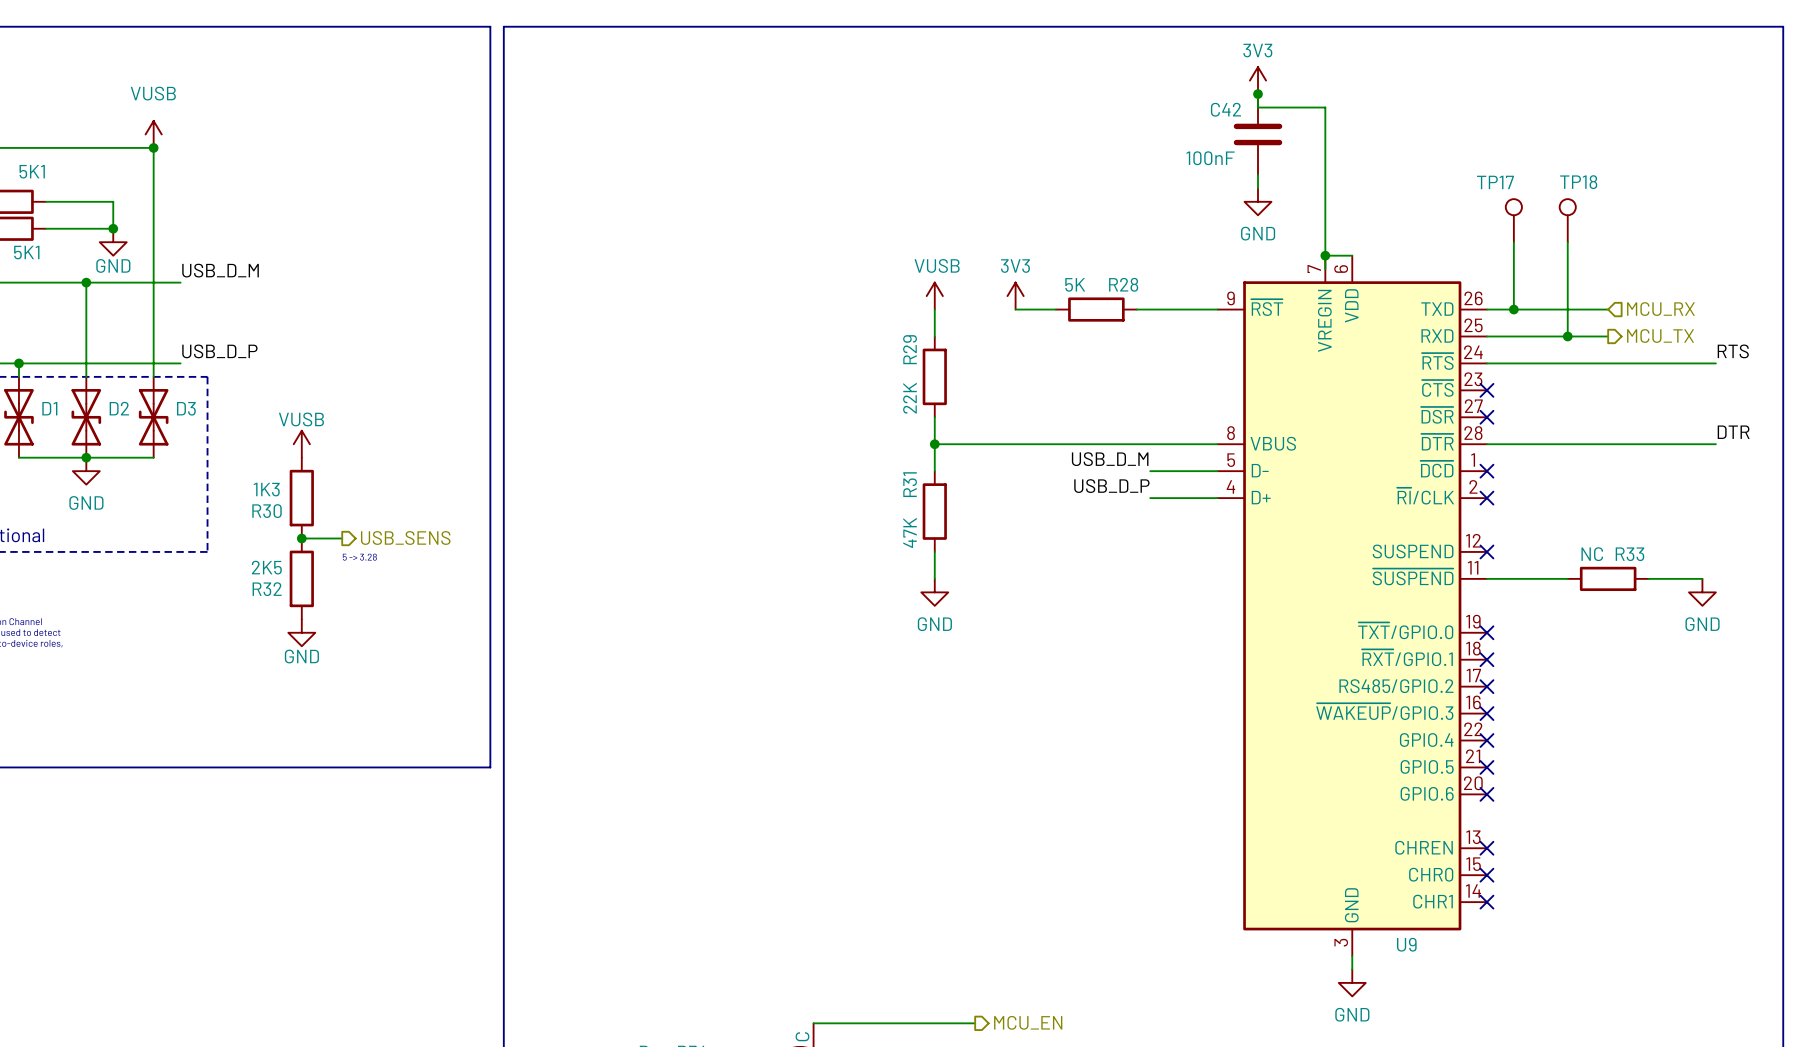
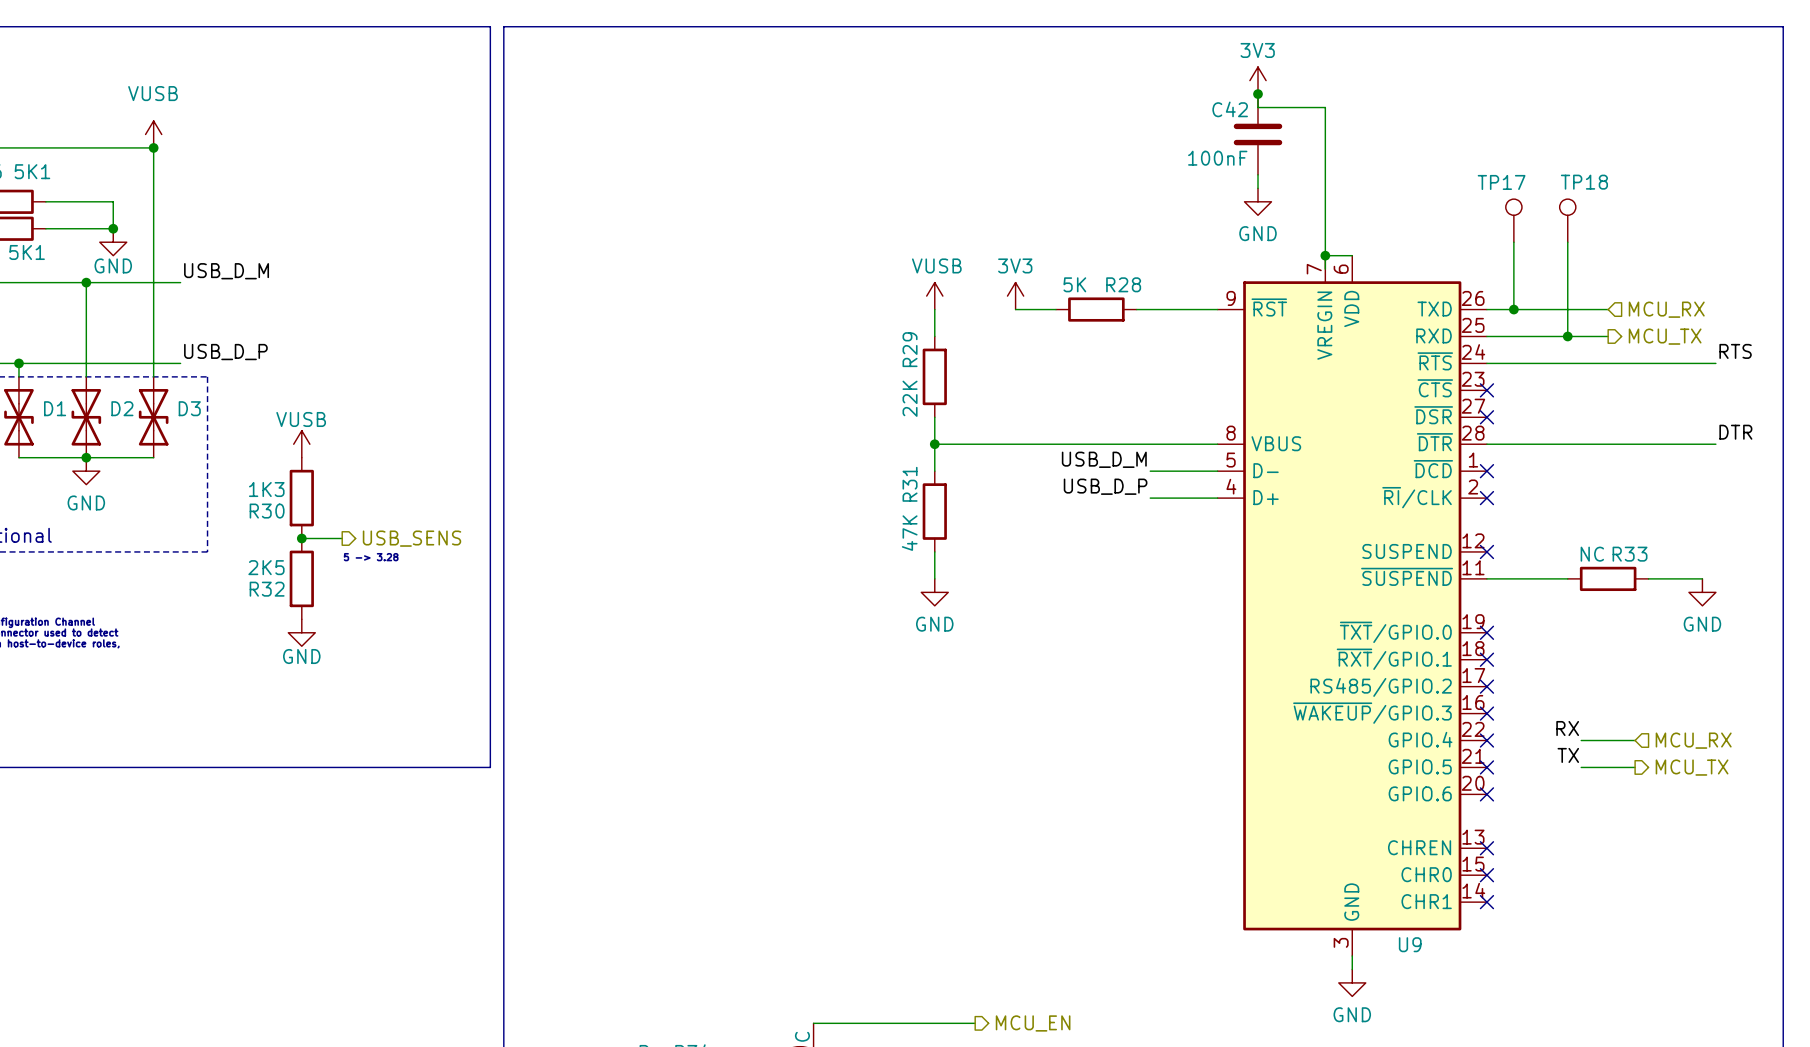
label: none -> RX (1567, 728)
wire: none -> (1581, 740) (1635, 740)
hierarchical label: none -> MCU_RX (1693, 740)
label: none -> TX (1568, 755)
hierarchical label: none -> MCU_TX (1692, 767)
wire: none -> (1581, 767) (1635, 767)

